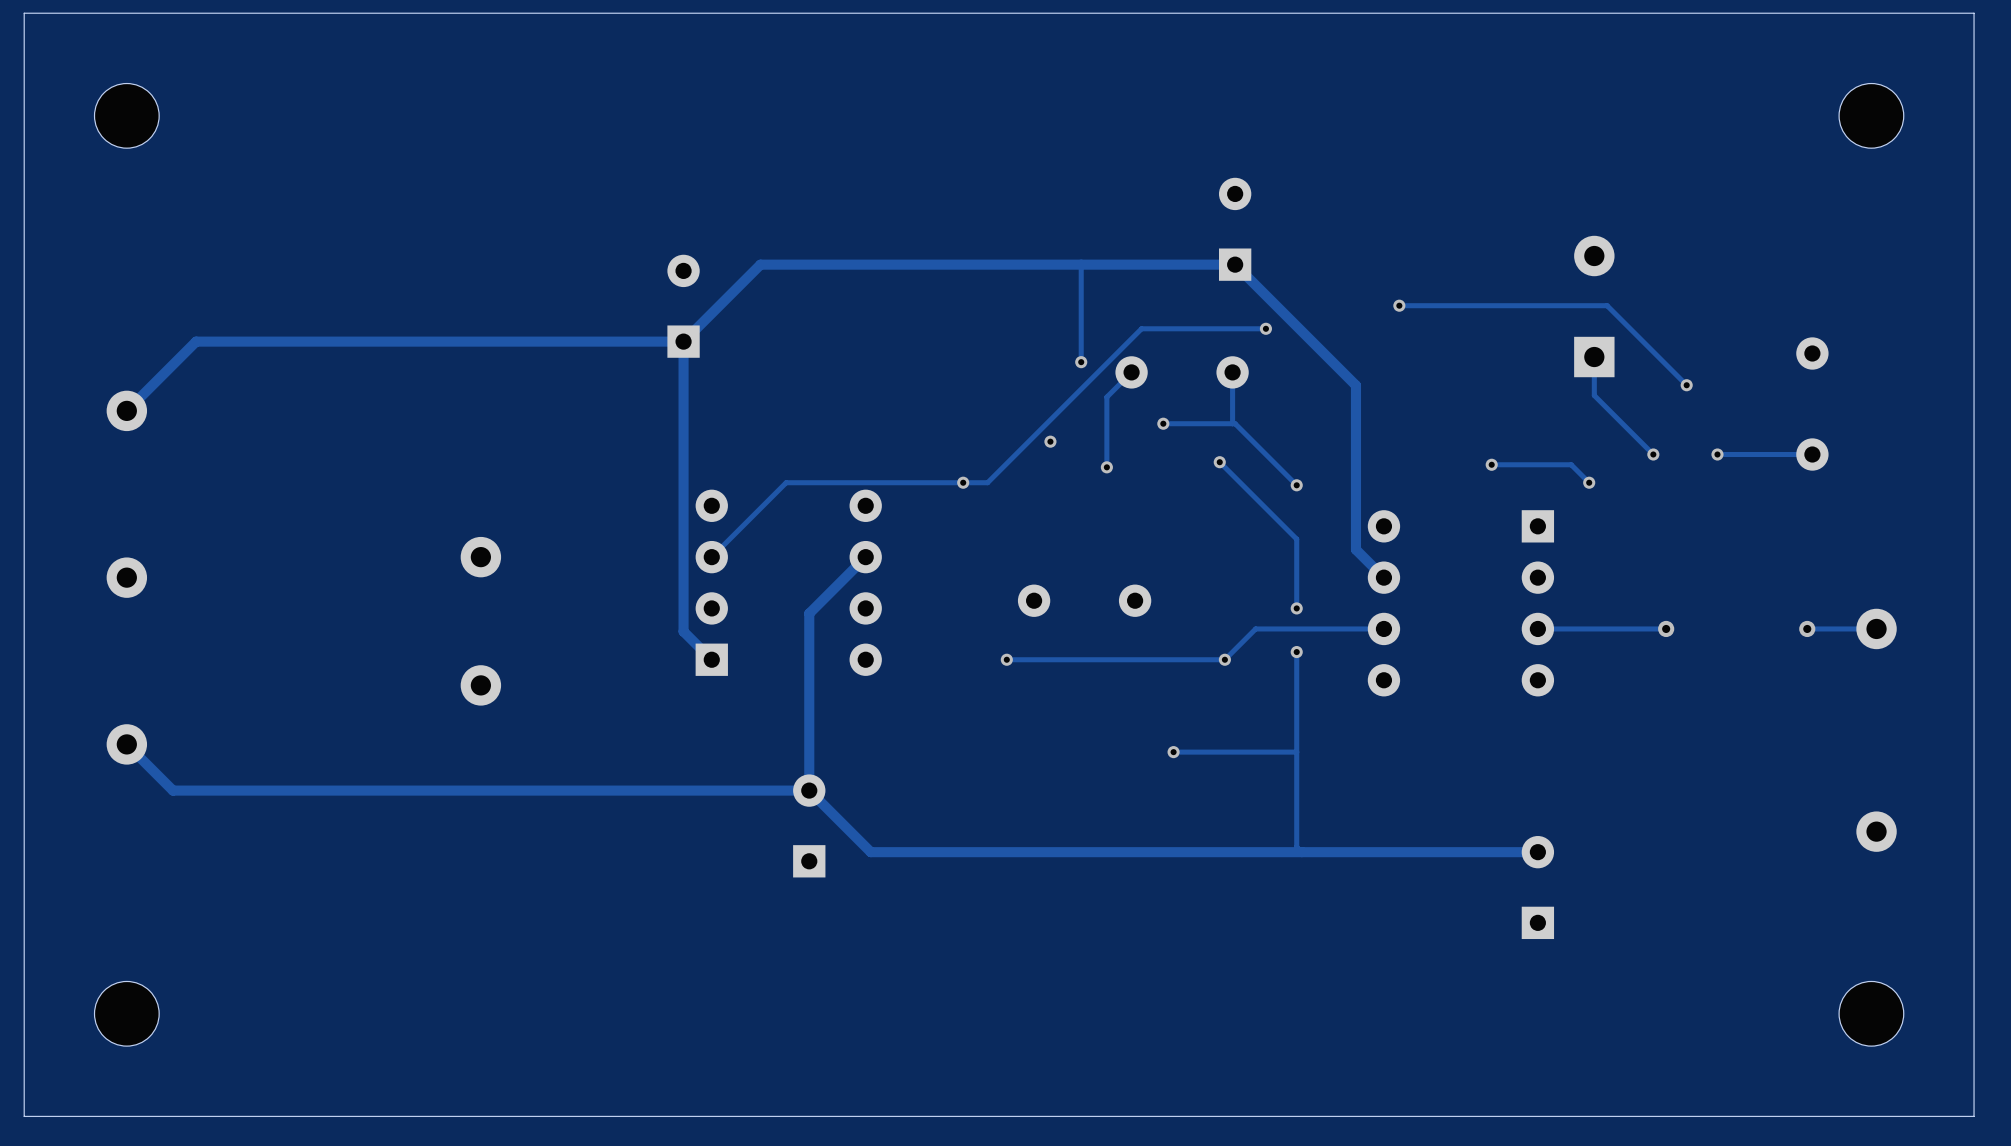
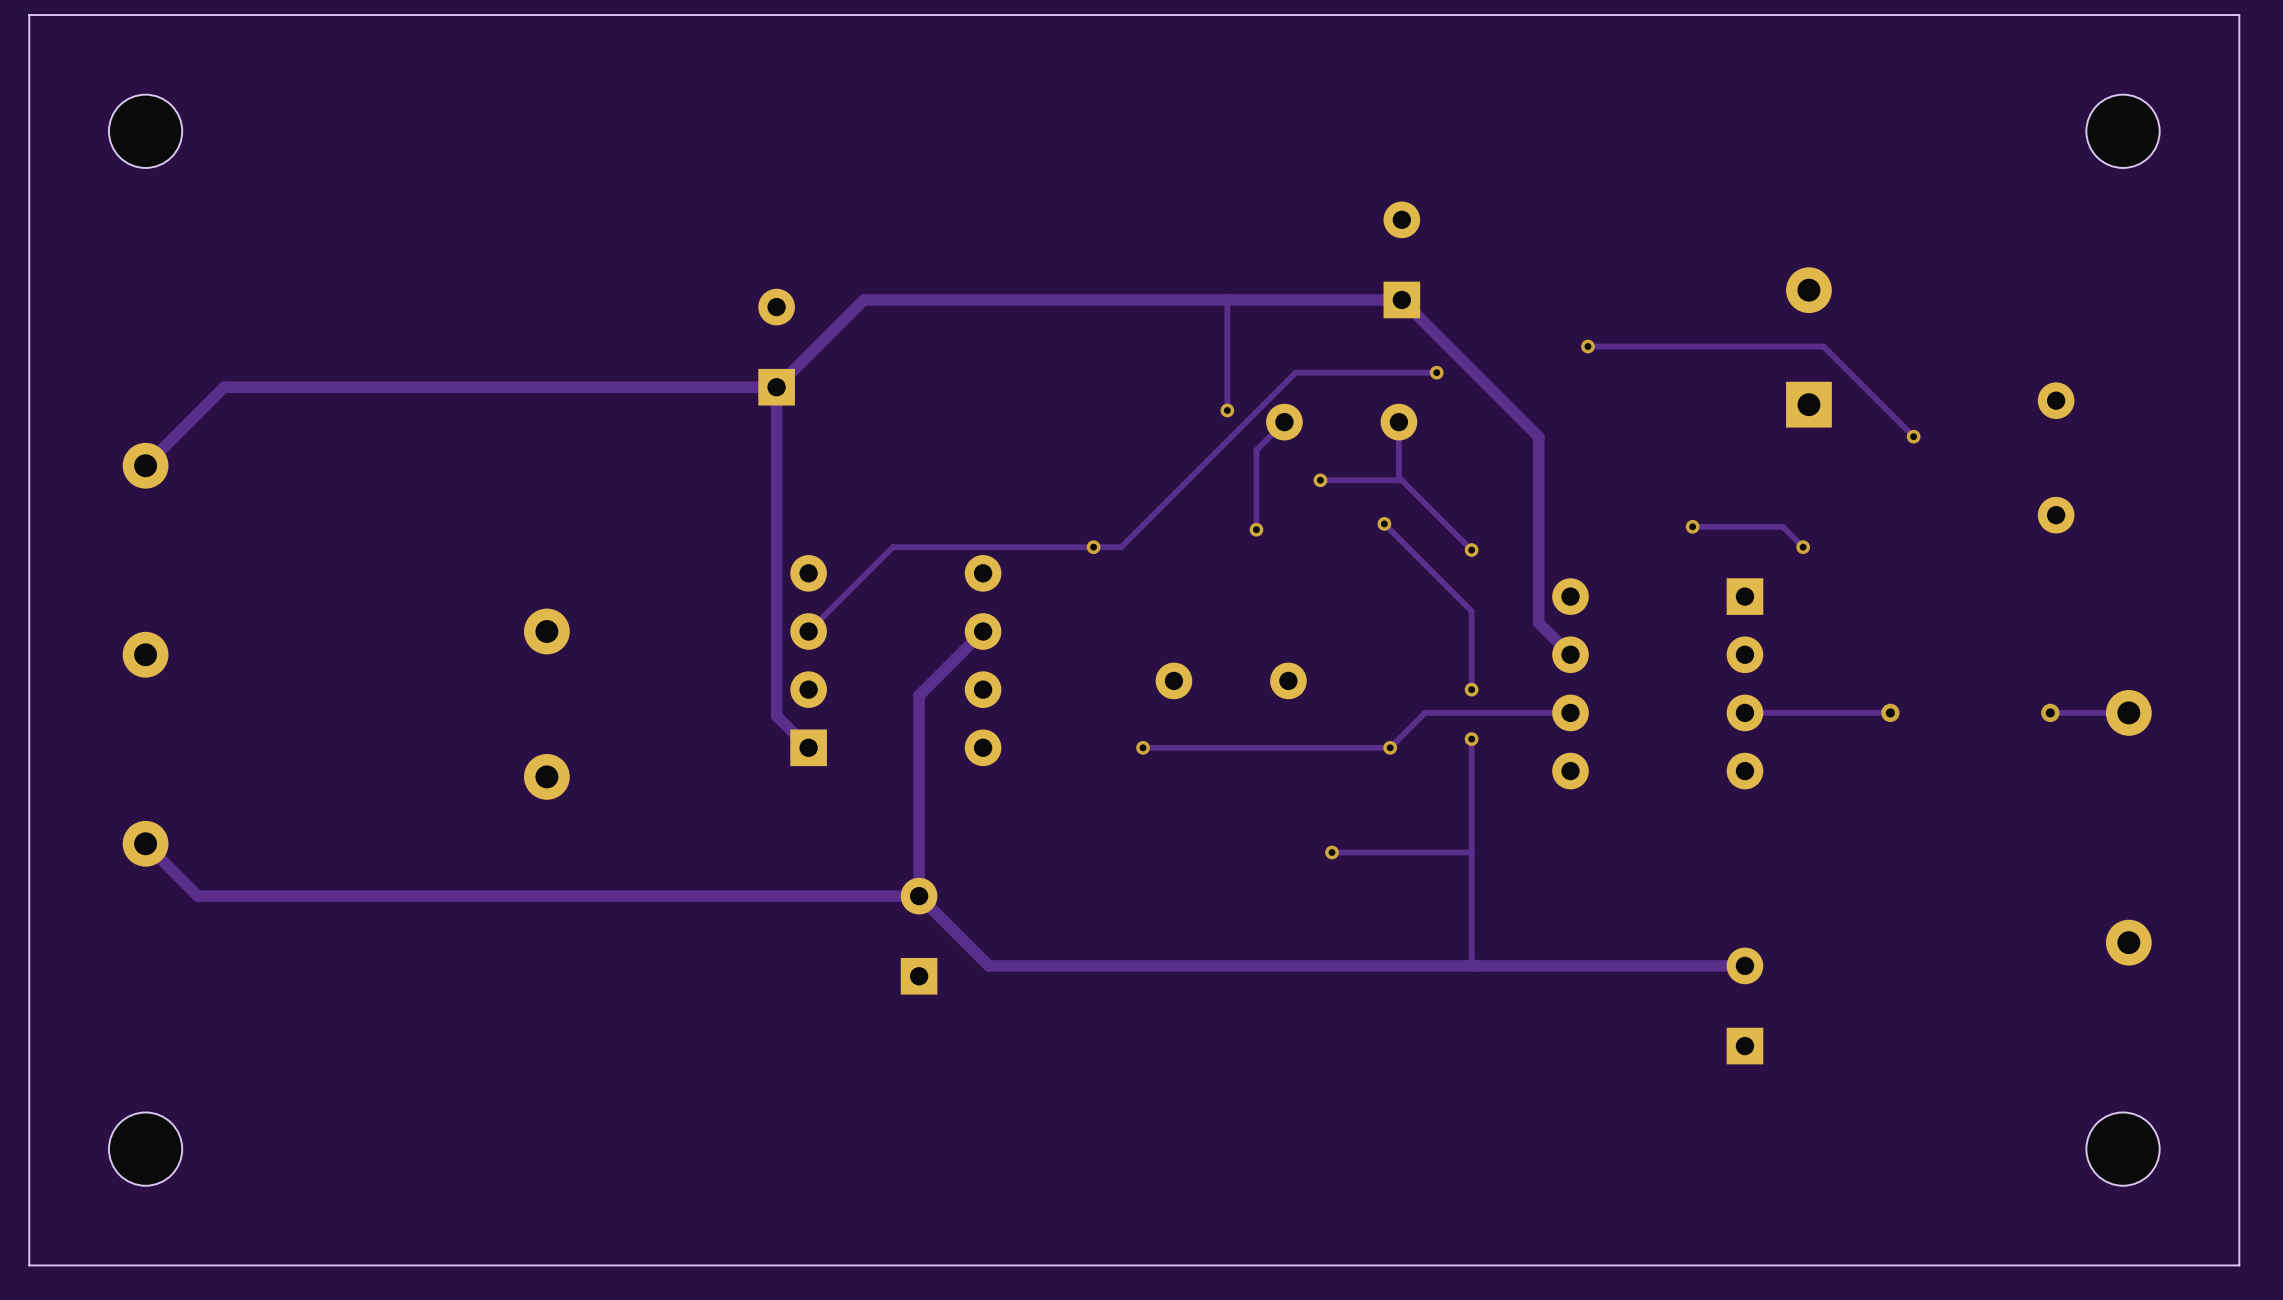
track: (1594, 357) (1594, 395) (1653, 454) -> none
via: (1050, 441) -> none
via: (1653, 454) -> none
via: (1717, 454) -> none
track: (1812, 454) (1717, 454) -> none

